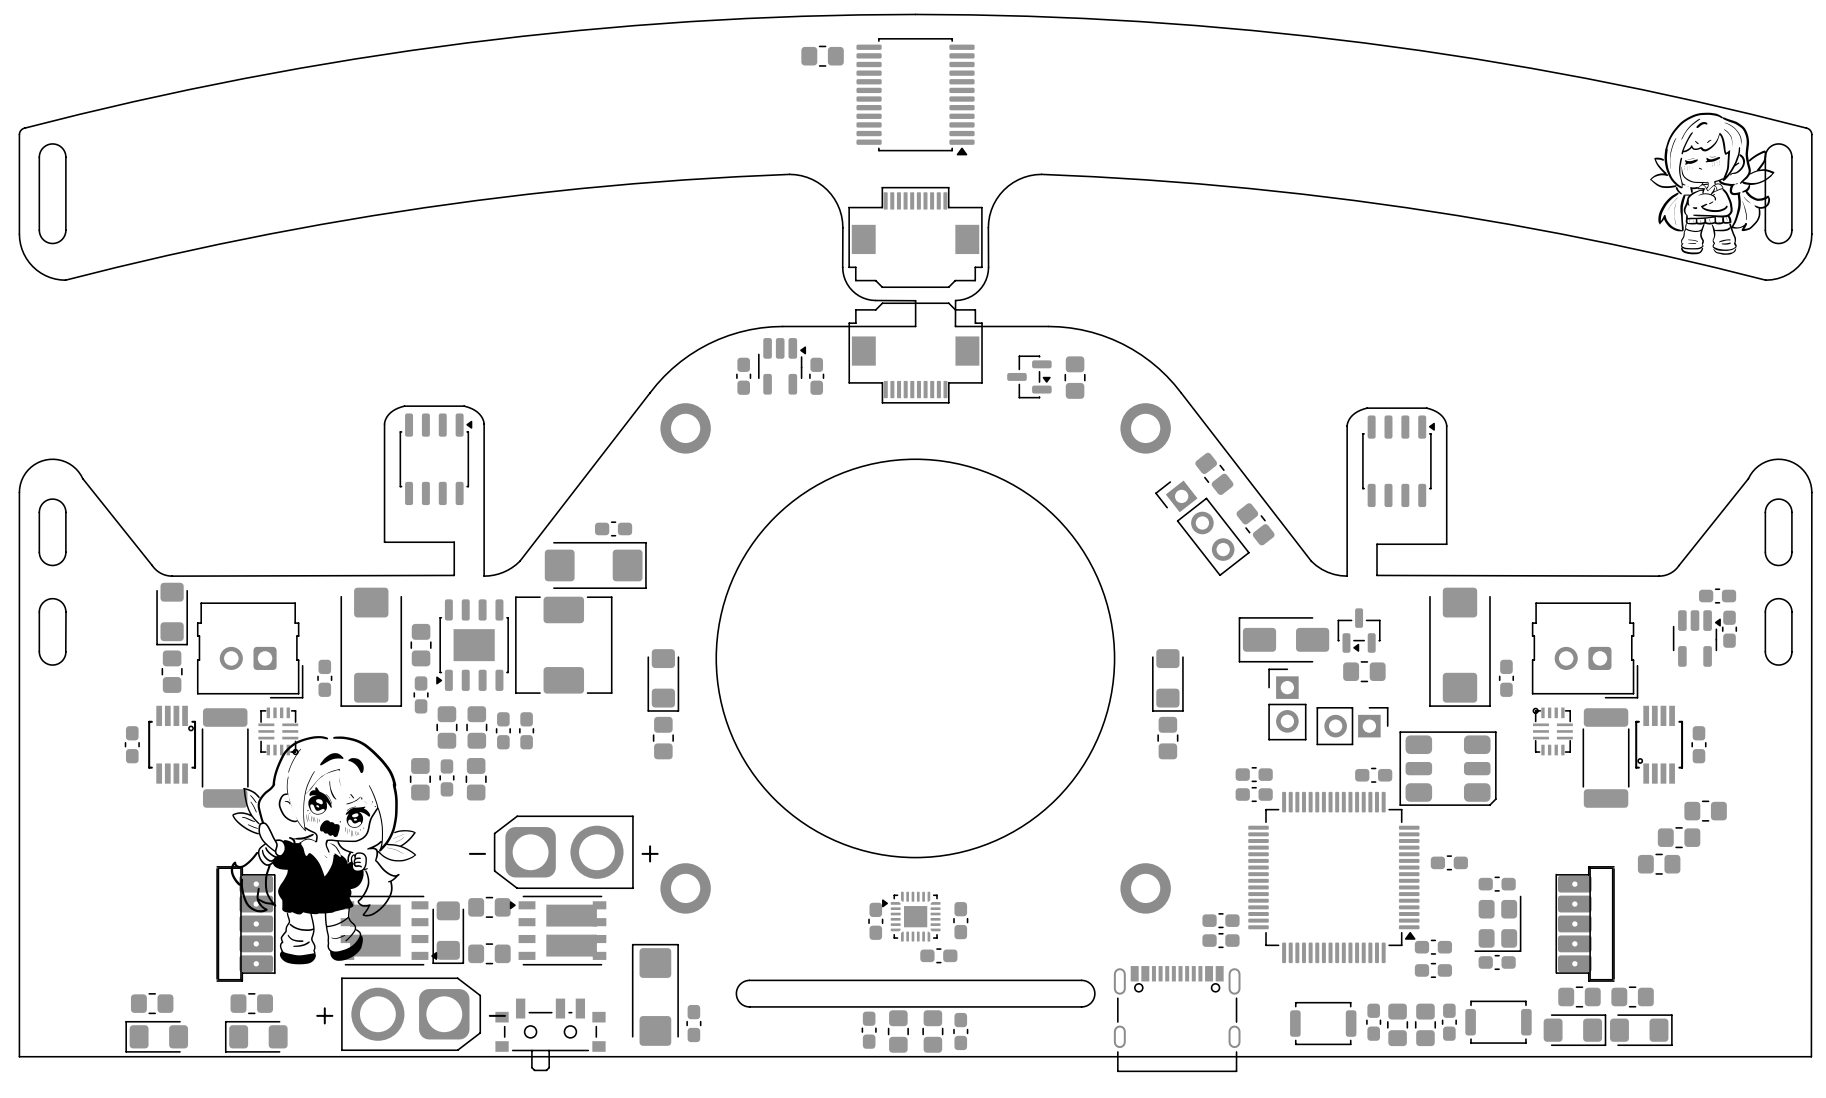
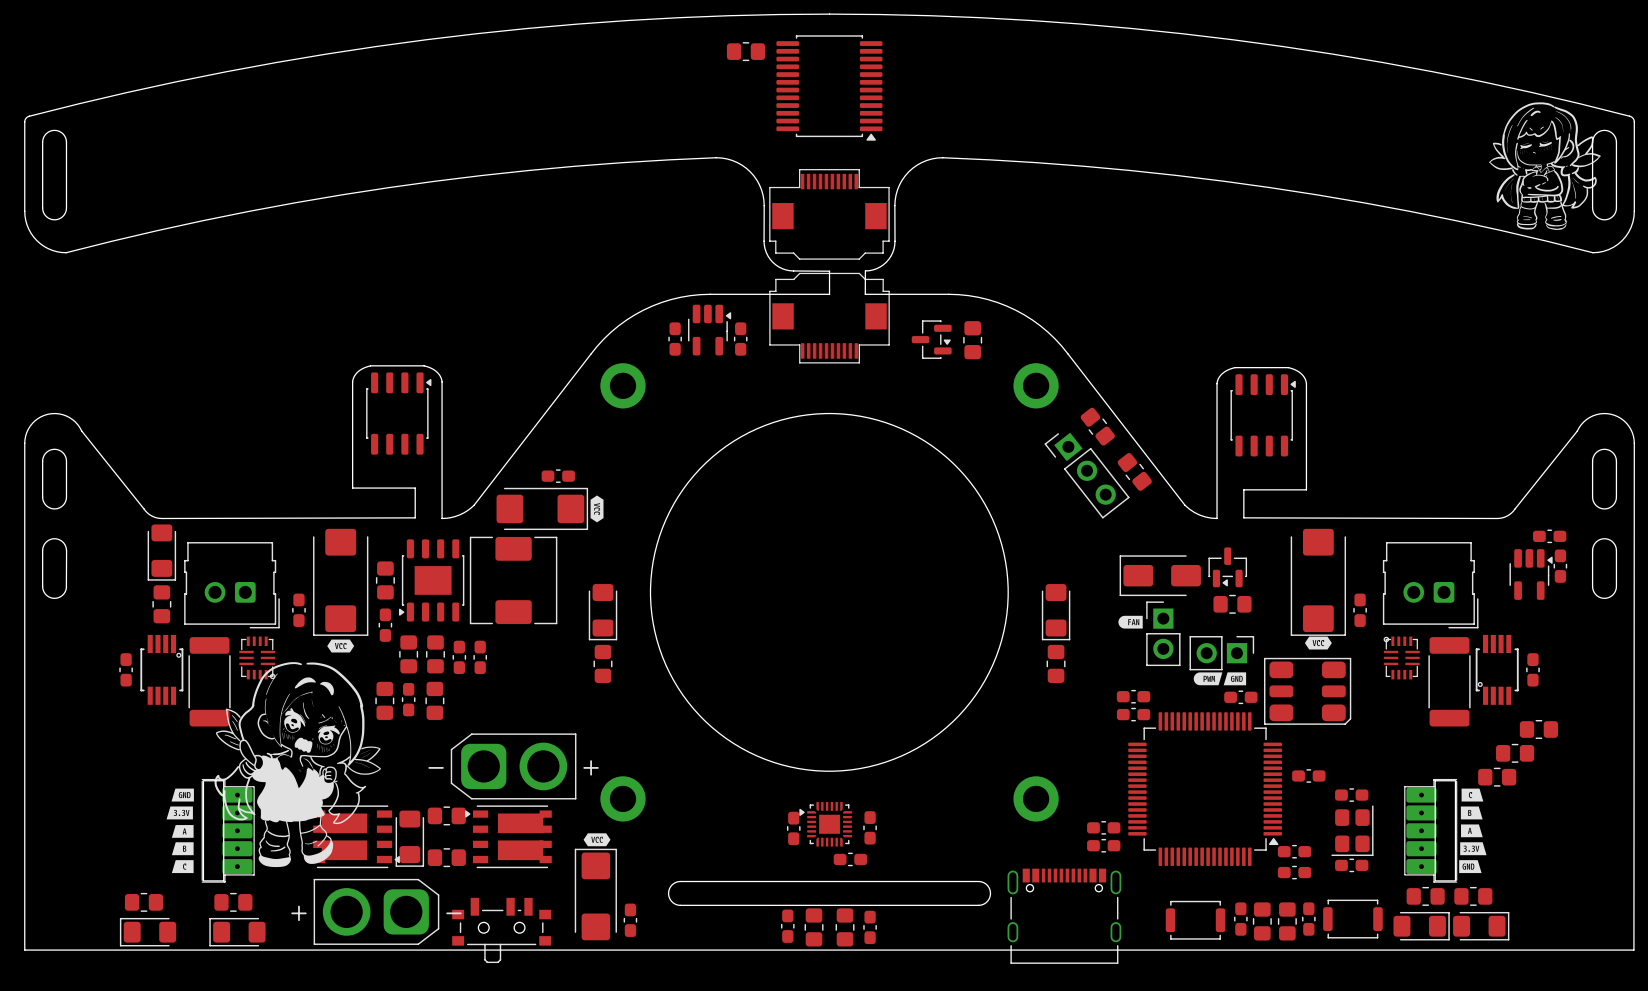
drawing: none -> [590, 495, 604, 523]
drawing: none -> [1118, 615, 1143, 629]
drawing: none -> [1304, 636, 1332, 650]
drawing: none -> [327, 639, 355, 653]
drawing: none -> [1193, 672, 1247, 686]
drawing: none -> [166, 788, 194, 874]
drawing: none -> [1459, 788, 1487, 874]
drawing: none -> [583, 833, 611, 847]

